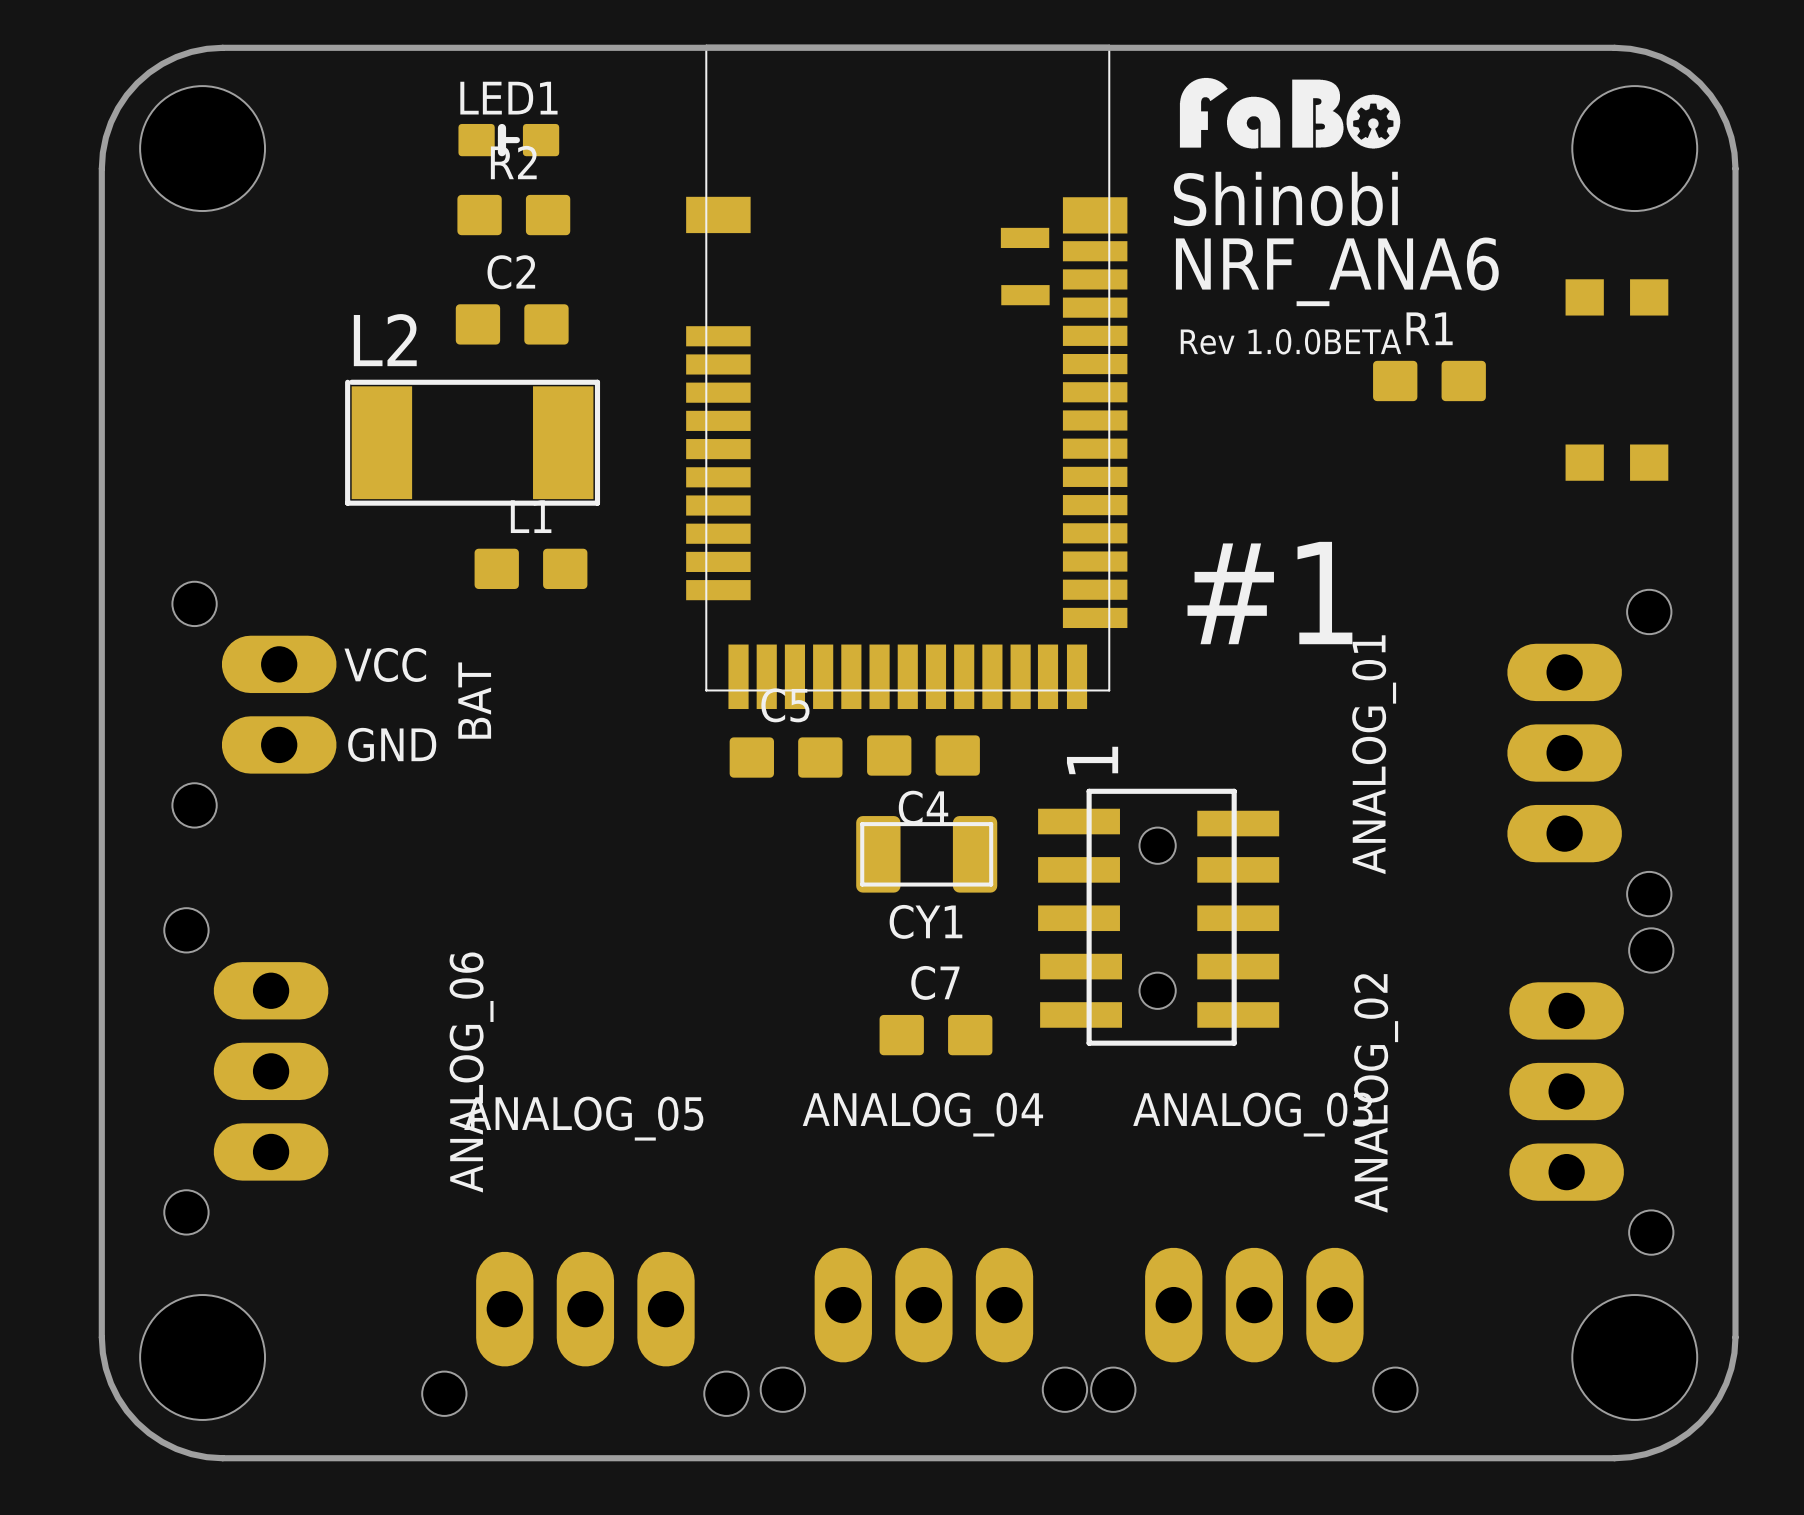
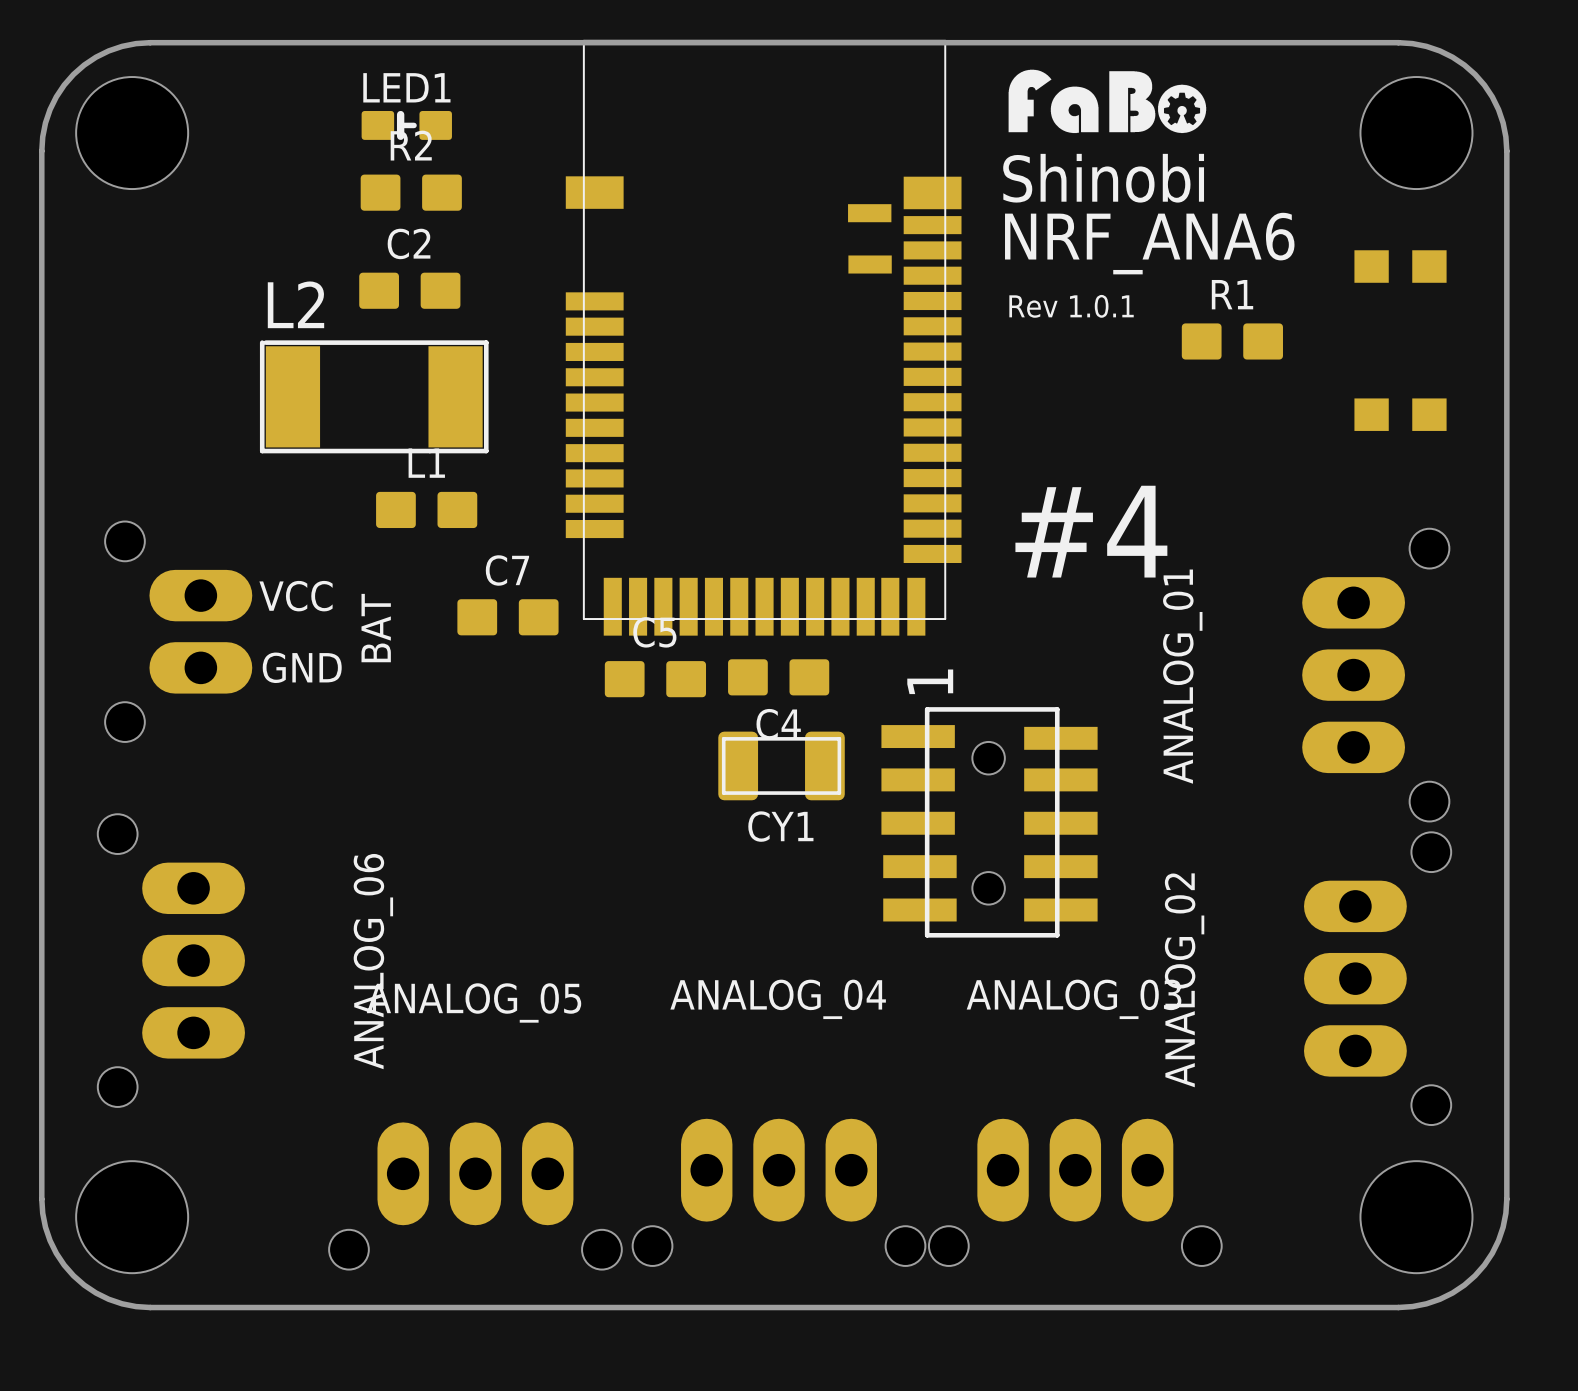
text: Rev 1.0.0BETA (1290, 341) -> Rev 1.0.1 (1071, 306)
text: #1 (1269, 593) -> #4 (1091, 531)
C7 position: (935, 1035) -> (507, 617)

